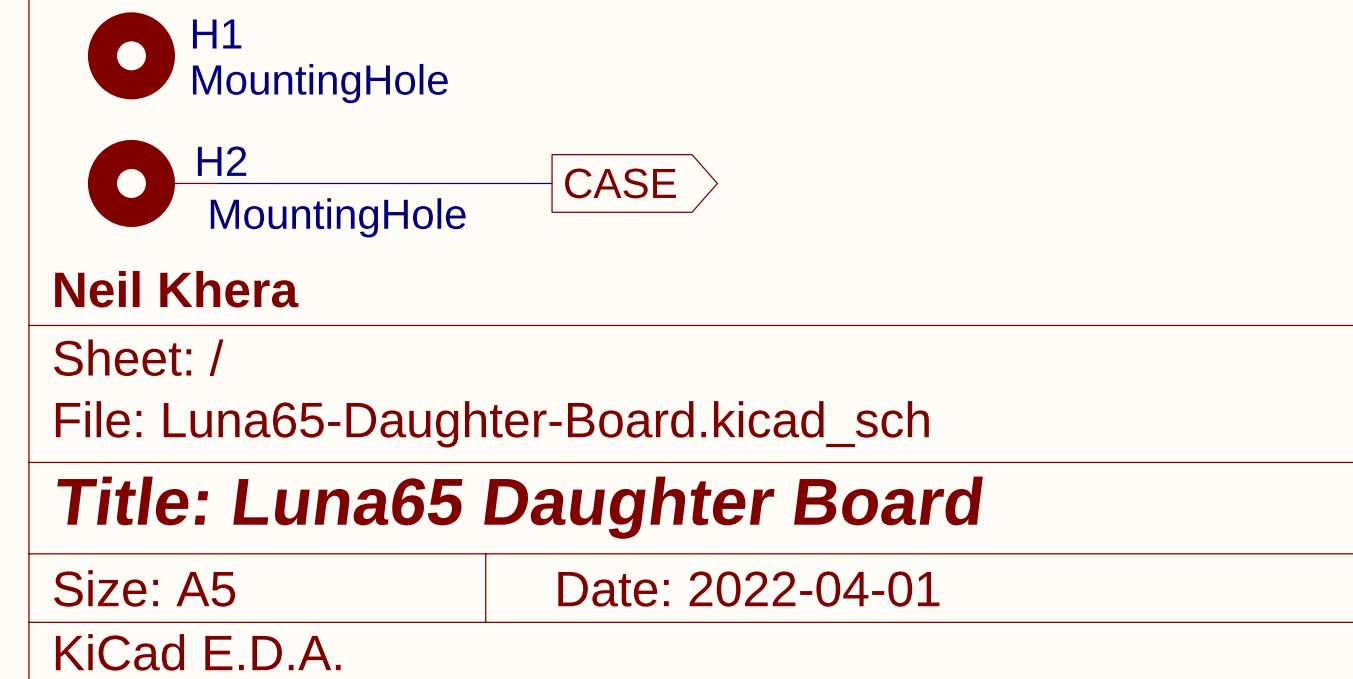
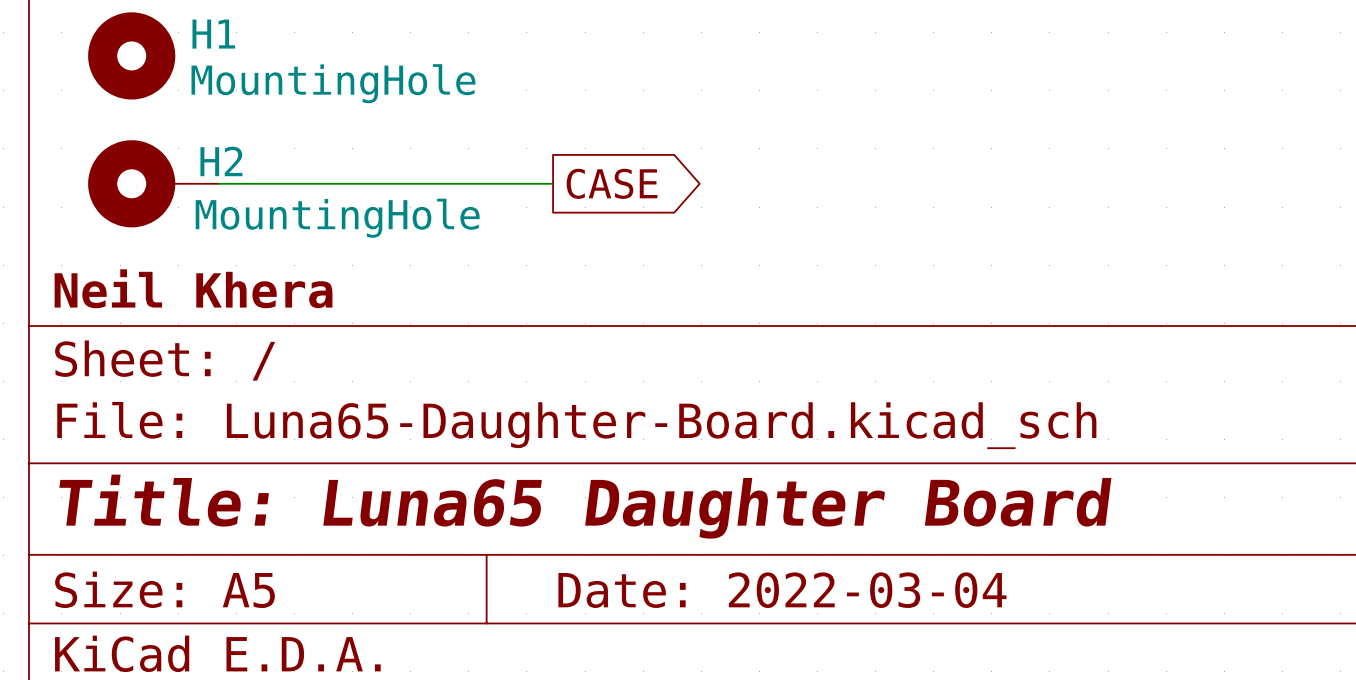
title block: Date: 2022-04-01 (748, 589) -> Date: 2022-03-04 (782, 590)

